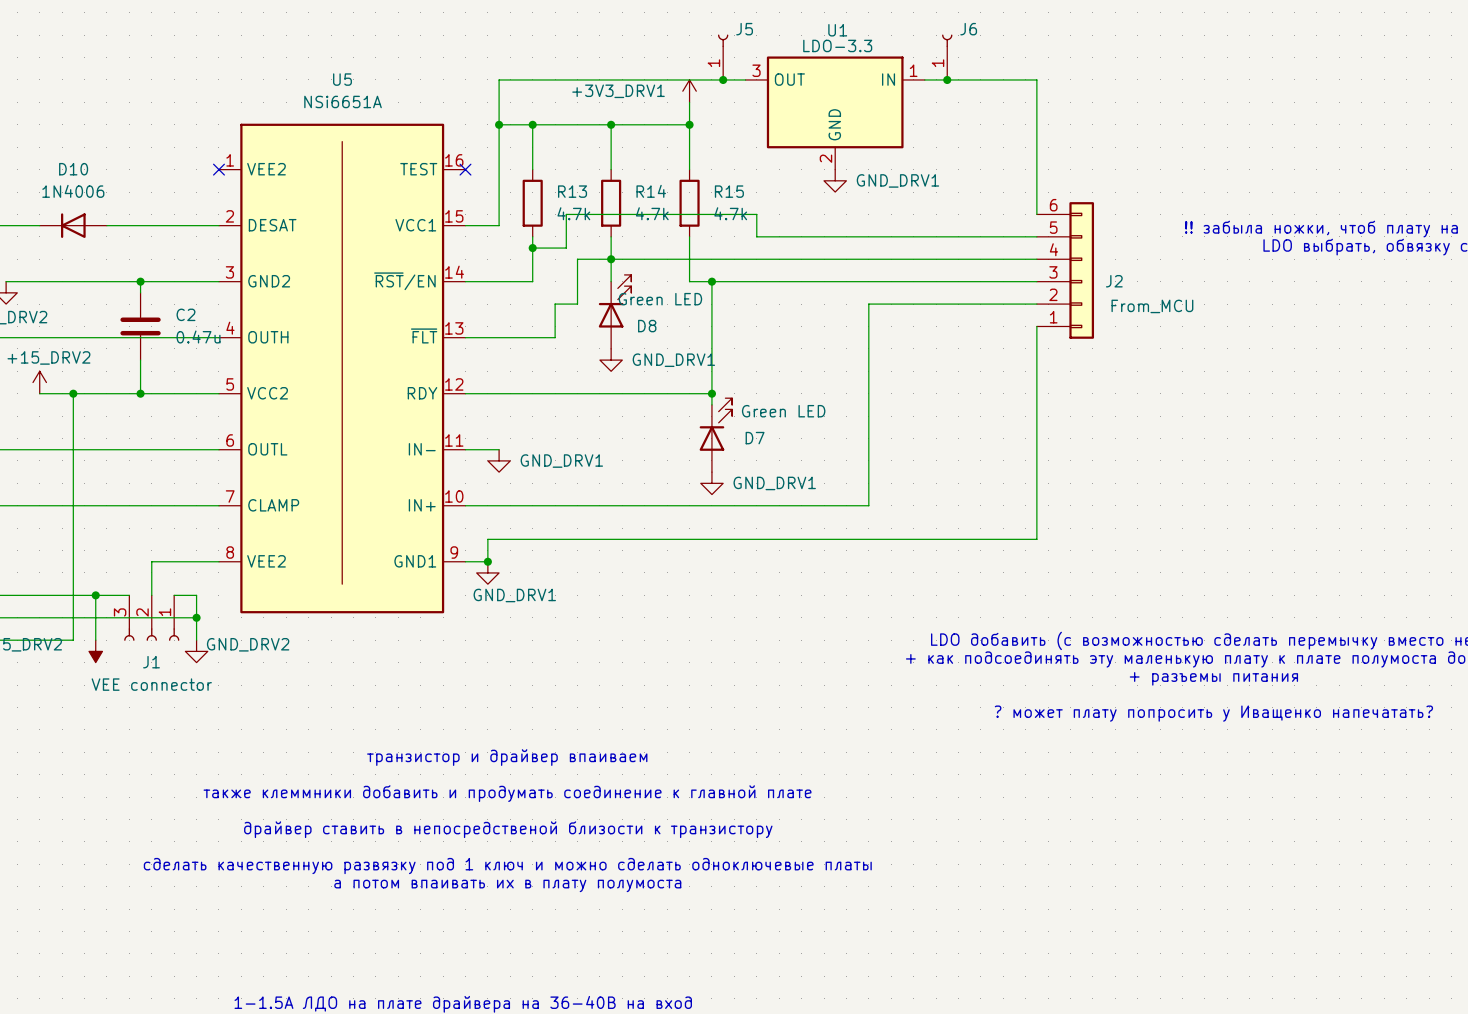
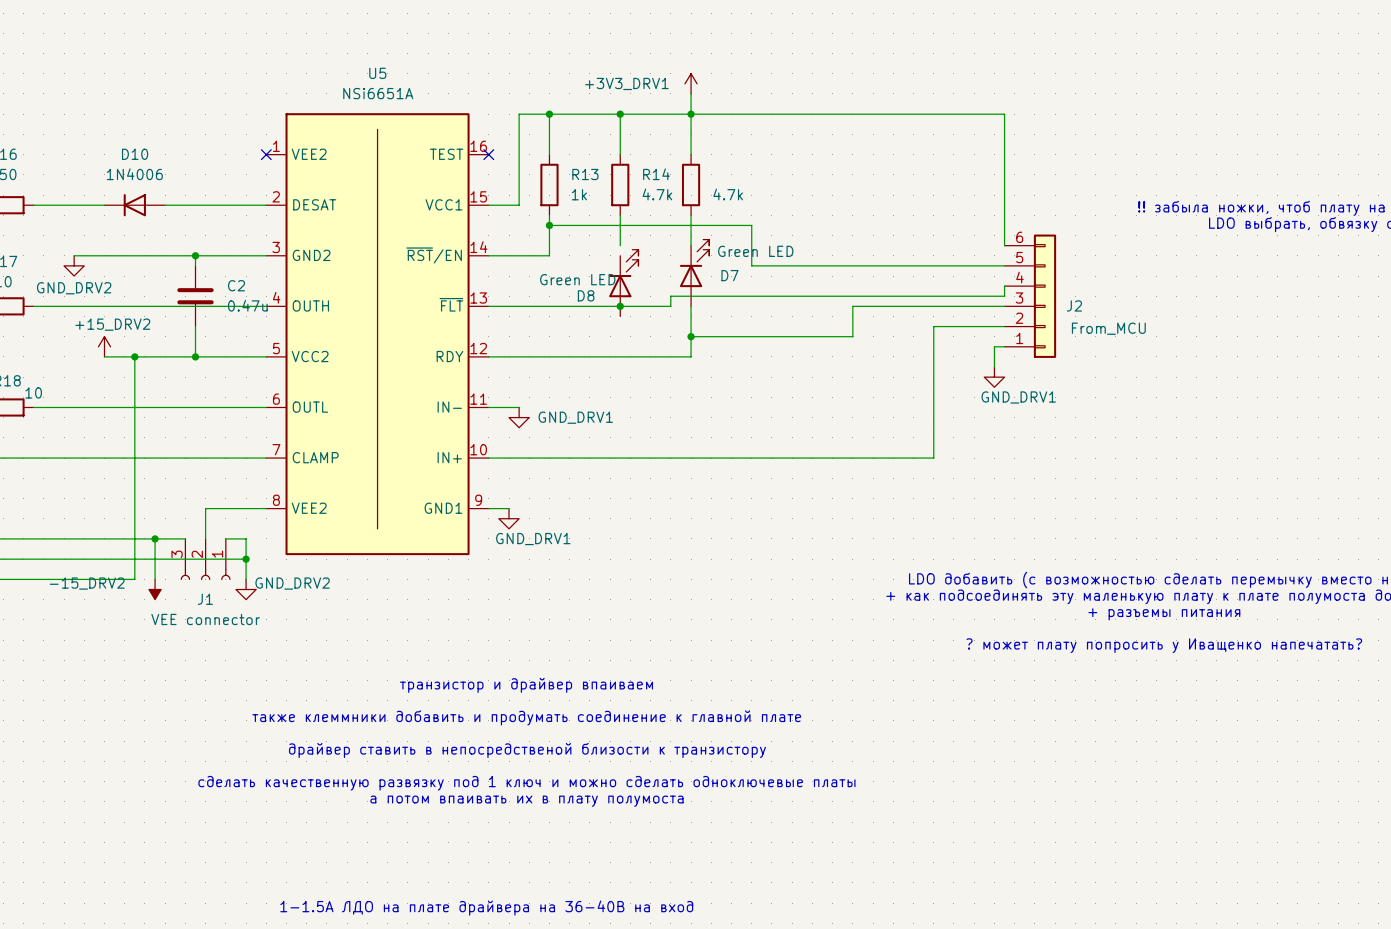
J5: (723, 57) -> none
J6: (947, 57) -> none
junction: (723, 79) -> none
wire: (745, 79) (499, 79) (499, 124) -> none
wire: (924, 79) (1036, 79) (1036, 124) -> (691, 114) (1004, 114)
junction: (947, 79) -> none
U1: LDO-3.3 (835, 113) -> none
junction: (499, 124) -> none
power symbol: GND_DRV1 (835, 180) -> none
R15 name: R15 (729, 191) -> none
R13 value: 4.7k (573, 213) -> 1k (579, 194)
wire: none -> (1004, 195) (1004, 245)
wire: (1036, 236) (756, 236) (756, 214) (566, 214) (566, 248) -> (1004, 265) (751, 265) (751, 225) (579, 225)
junction: (611, 259) -> none
wire: (1036, 259) (577, 259) (577, 304) (555, 304) (555, 337) -> (1004, 286) (1004, 296) (670, 296) (670, 306) (569, 306)
wire: (611, 270) (611, 281) -> none
wire: (689, 270) (689, 281) (1036, 281) -> none
J2 position: (1065, 270) -> (1030, 296)
wire: (711, 281) (711, 404) -> none
junction: (711, 281) -> none
D8 value position: Green LED (660, 299) -> Green LED (577, 279)
wire: (1036, 304) (868, 304) (868, 337) -> (1004, 306) (852, 306)
D8 name position: D8 (647, 326) -> D8 (586, 295)
wire: (1036, 326) (1036, 539) (487, 539) (487, 561) -> none
junction: none -> (620, 306)
power symbol: GND_DRV1 (611, 360) -> none
wire: none -> (691, 336) (852, 336)
wire: (868, 371) (868, 505) -> (1004, 326) (933, 326) (933, 458) (852, 458)
wire: none -> (1004, 346) (994, 346) (994, 367)
wire: (689, 393) (711, 393) -> (691, 356) (691, 306)
junction position: (711, 393) -> (691, 336)
power symbol: none -> GND_DRV1 (994, 377)
D7 position: (715, 435) -> (694, 272)
power symbol: GND_DRV1 (711, 483) -> none
junction: (487, 561) -> none

